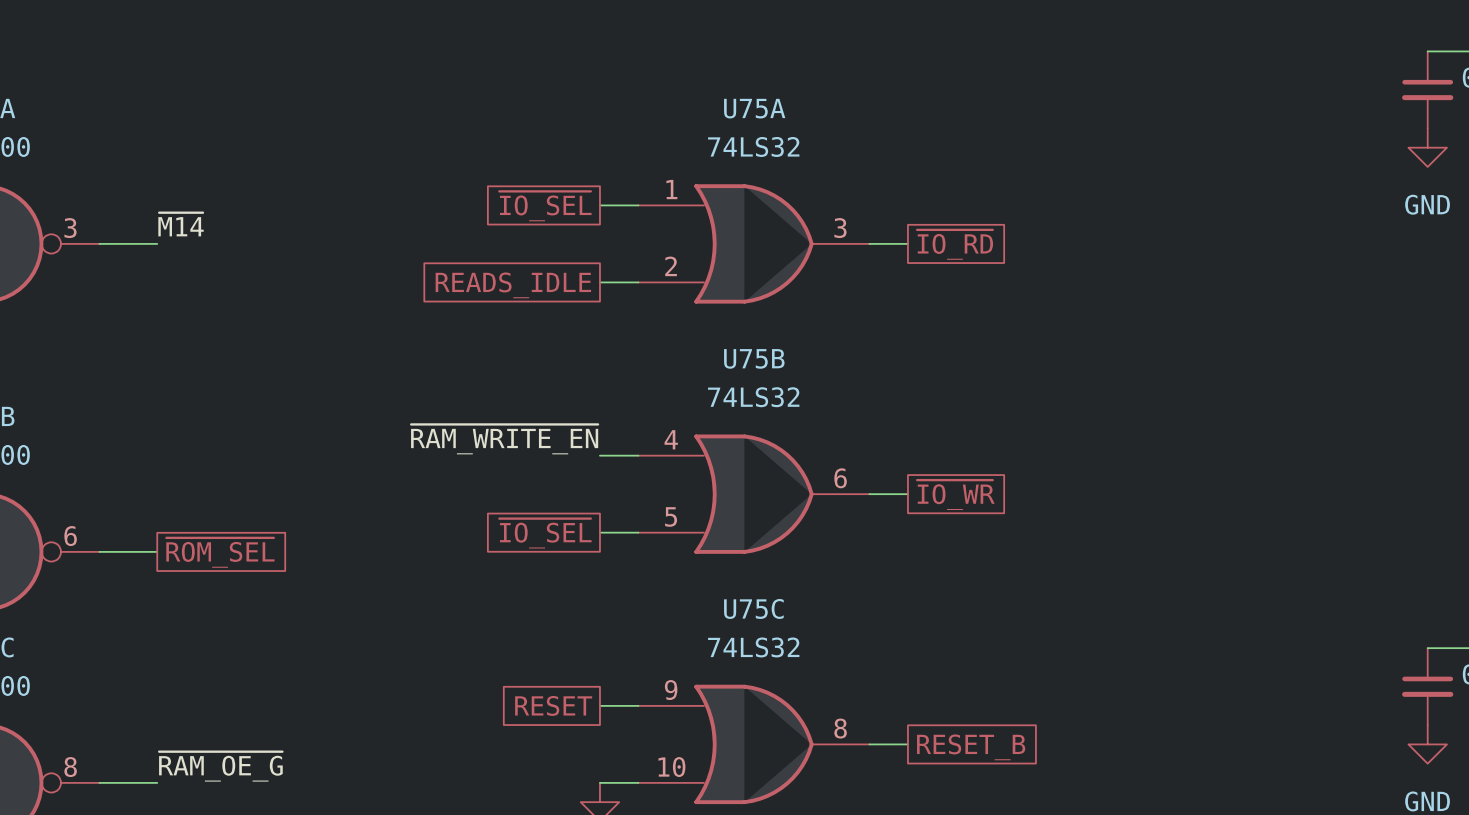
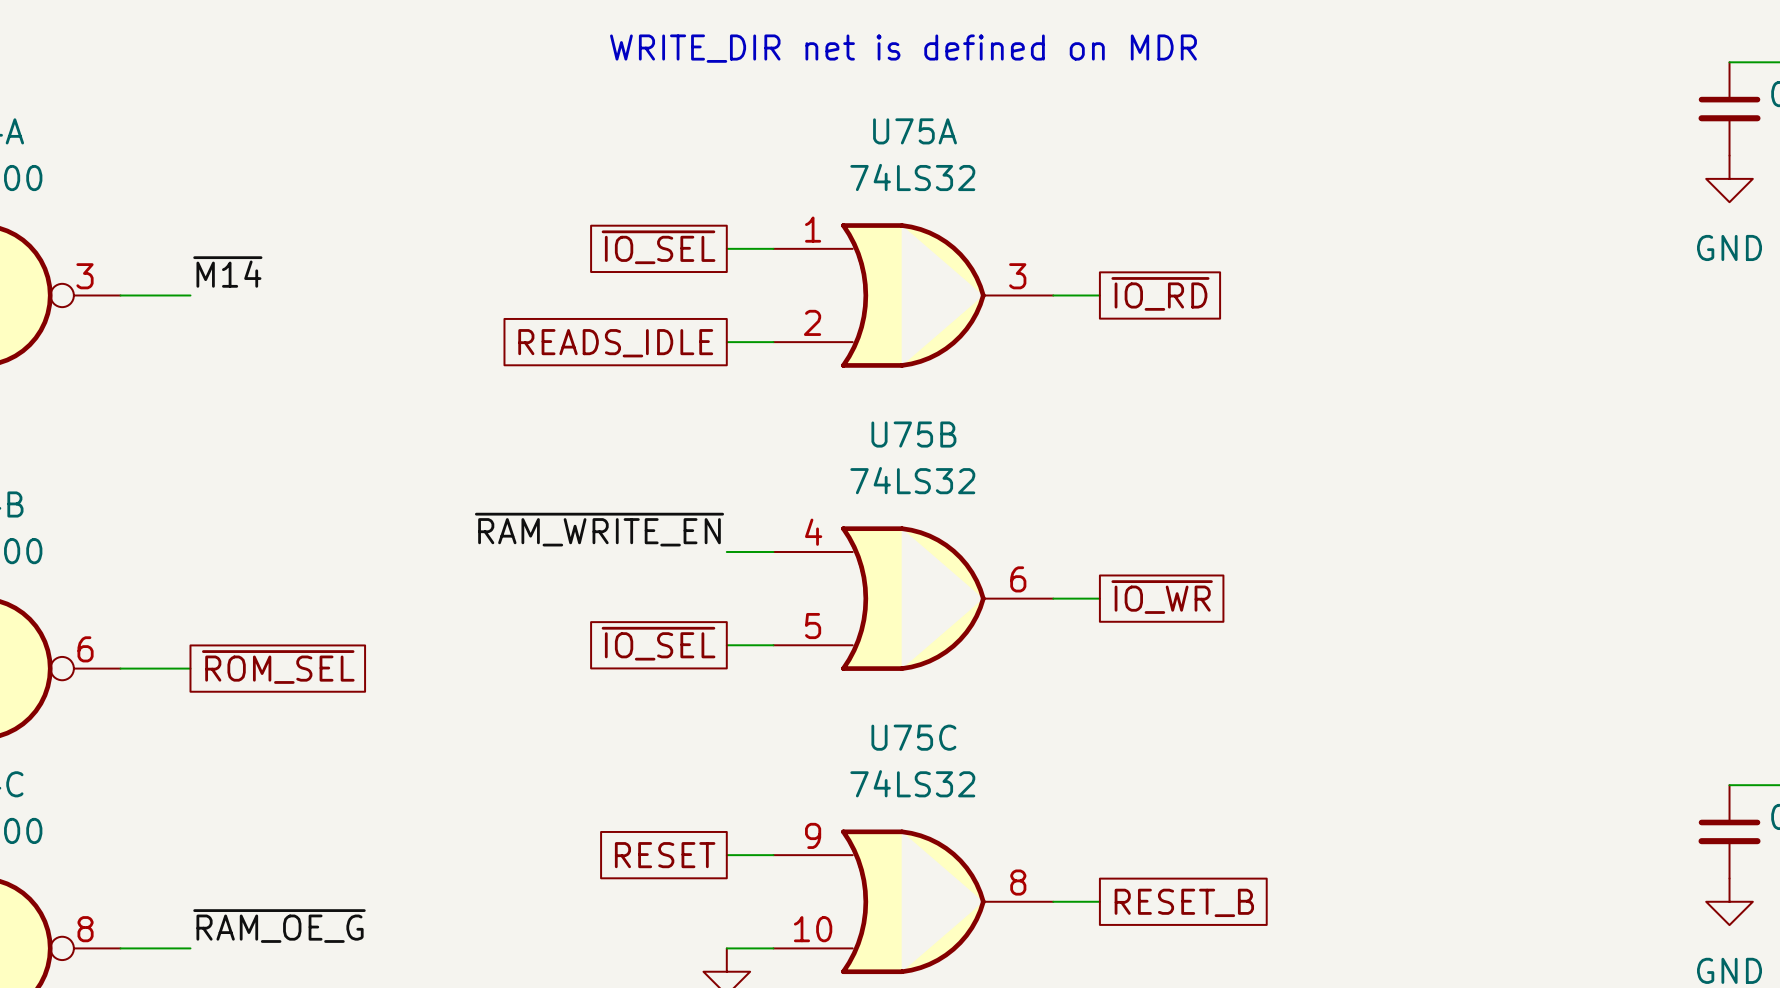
text: none -> WRITE_DIR net is defined on MDR (903, 48)

